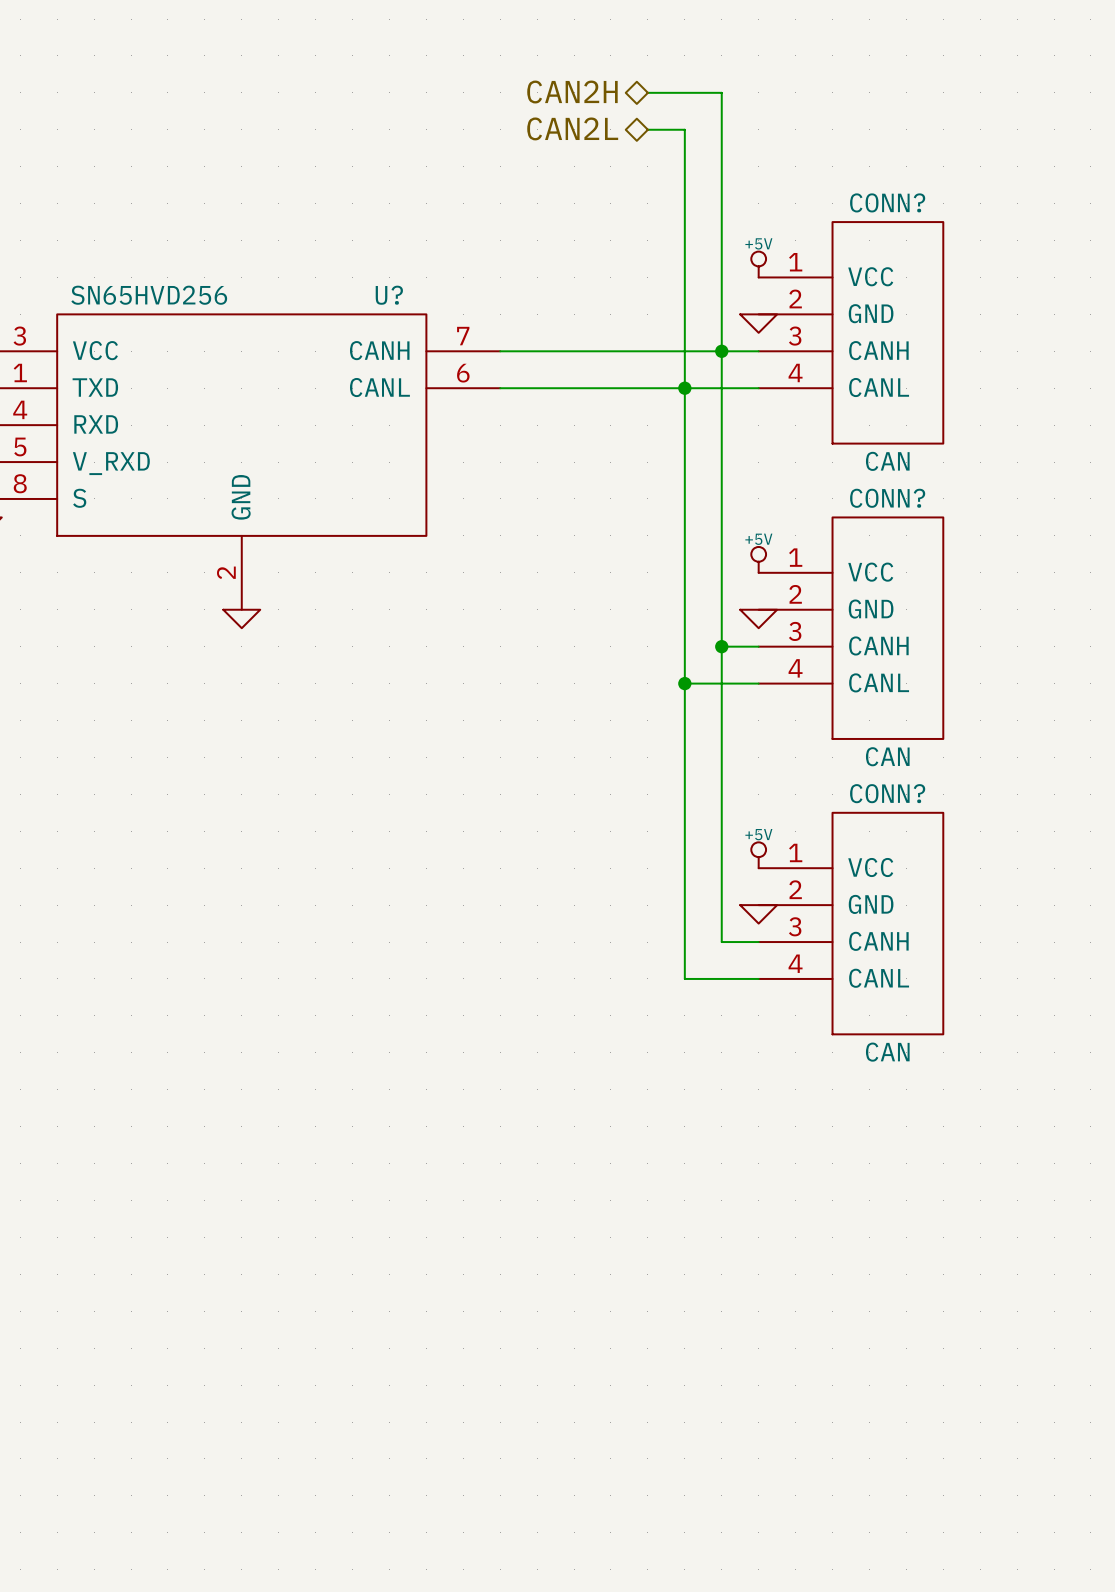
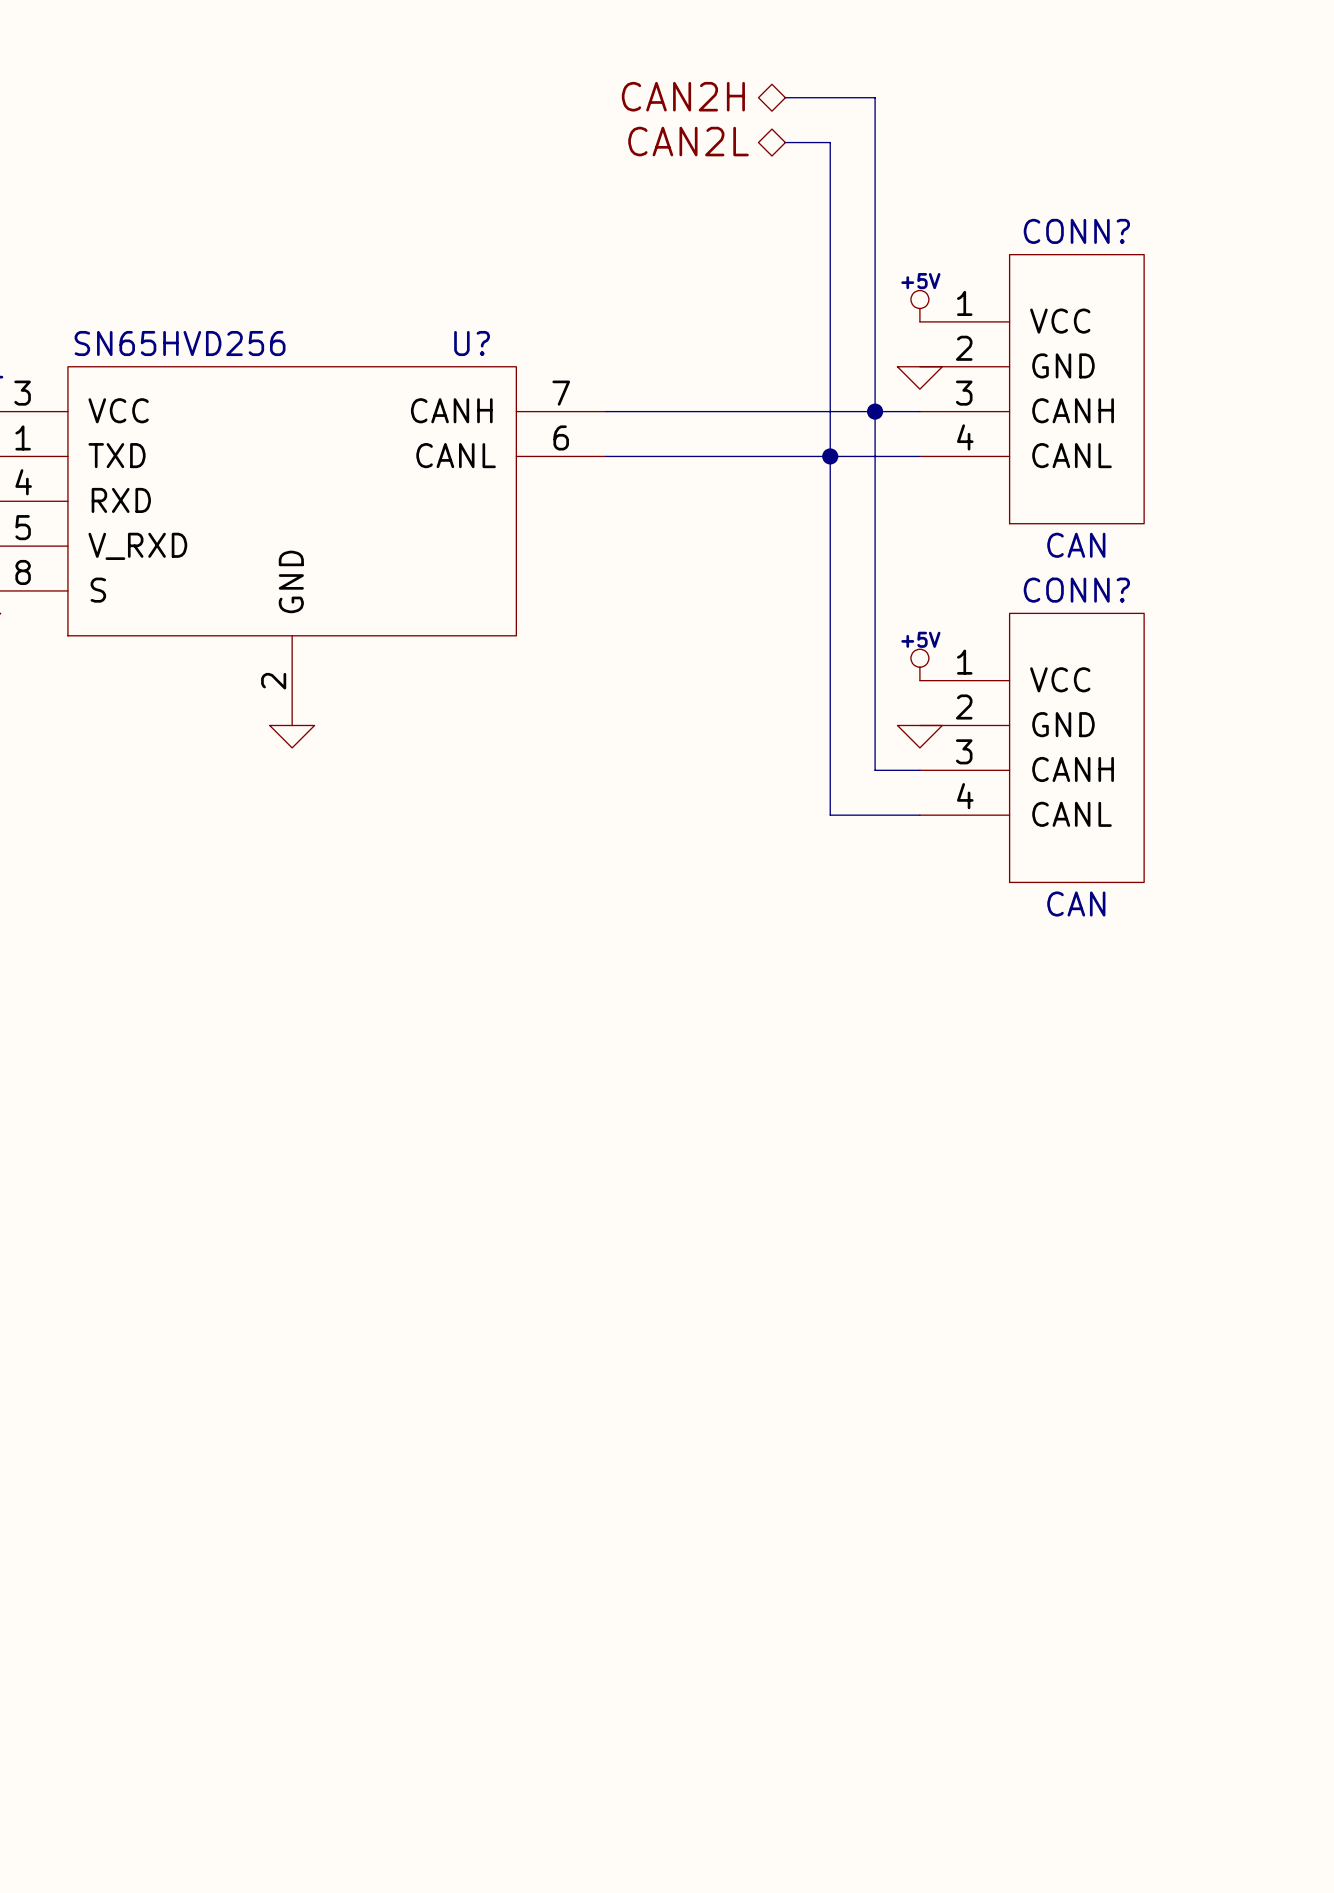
wire: (721, 646) (721, 942) (758, 942) -> none
junction: (721, 646) -> none
wire: (684, 683) (684, 978) (758, 978) -> none
junction: (684, 683) -> none
power symbol: +5V (758, 855) -> none
power symbol: (758, 914) -> none
CONN?: CAN (850, 923) -> none

